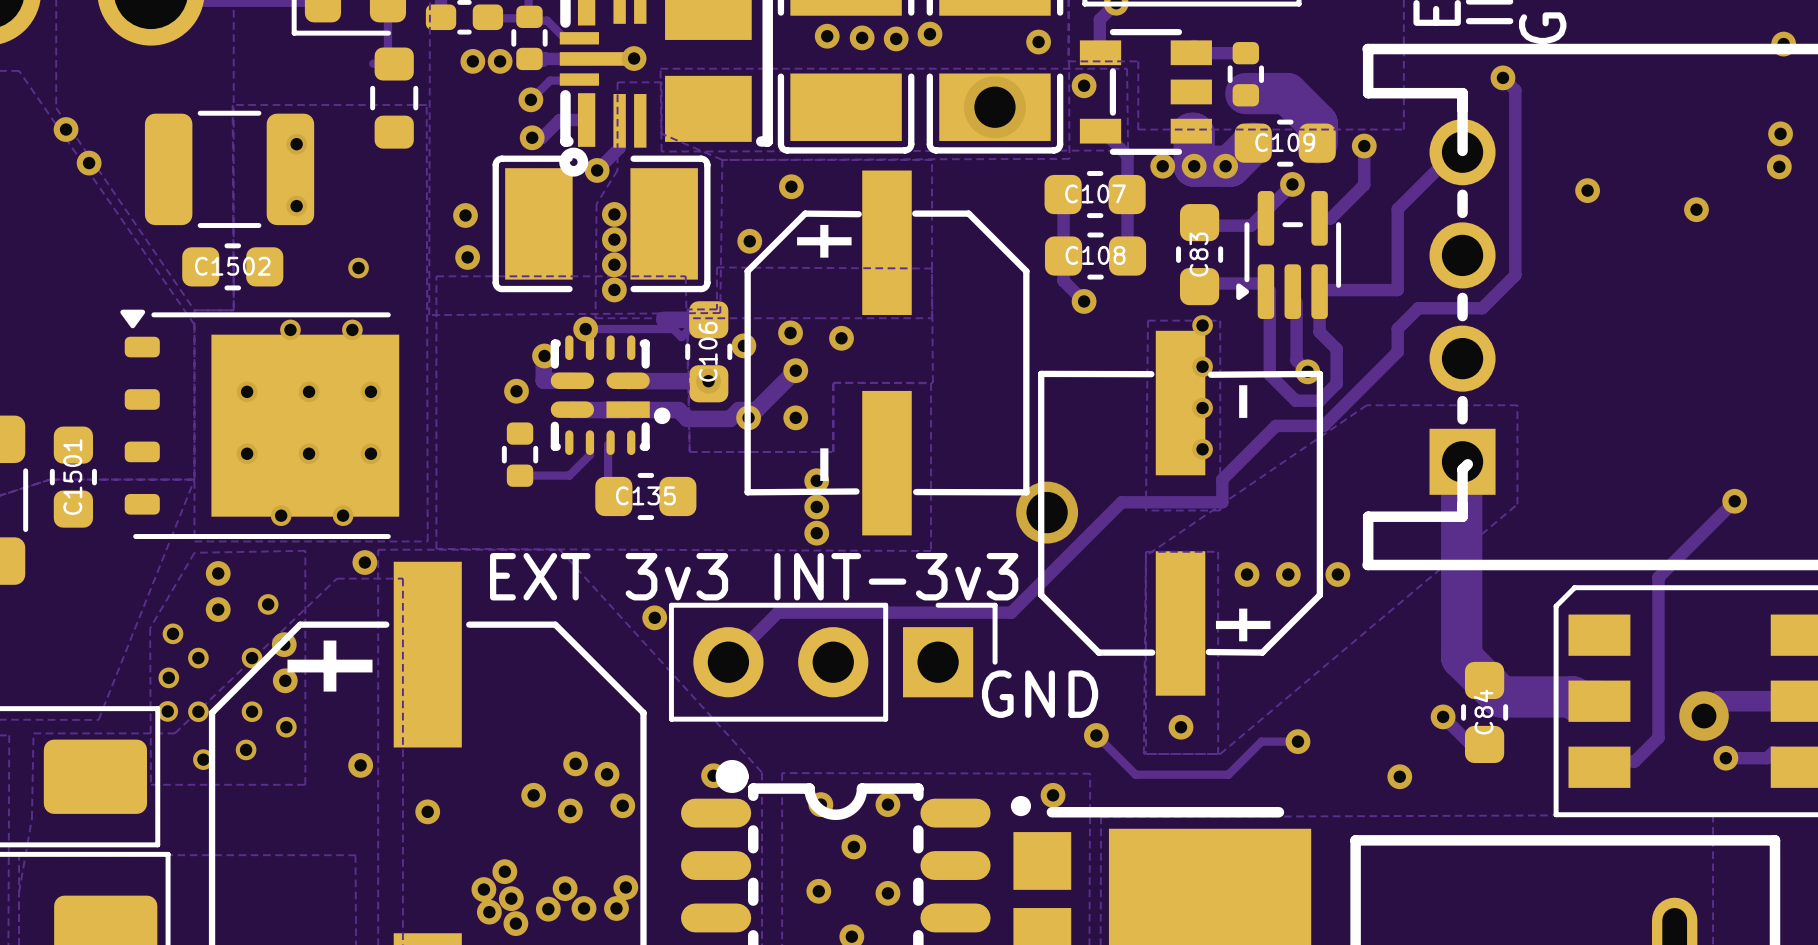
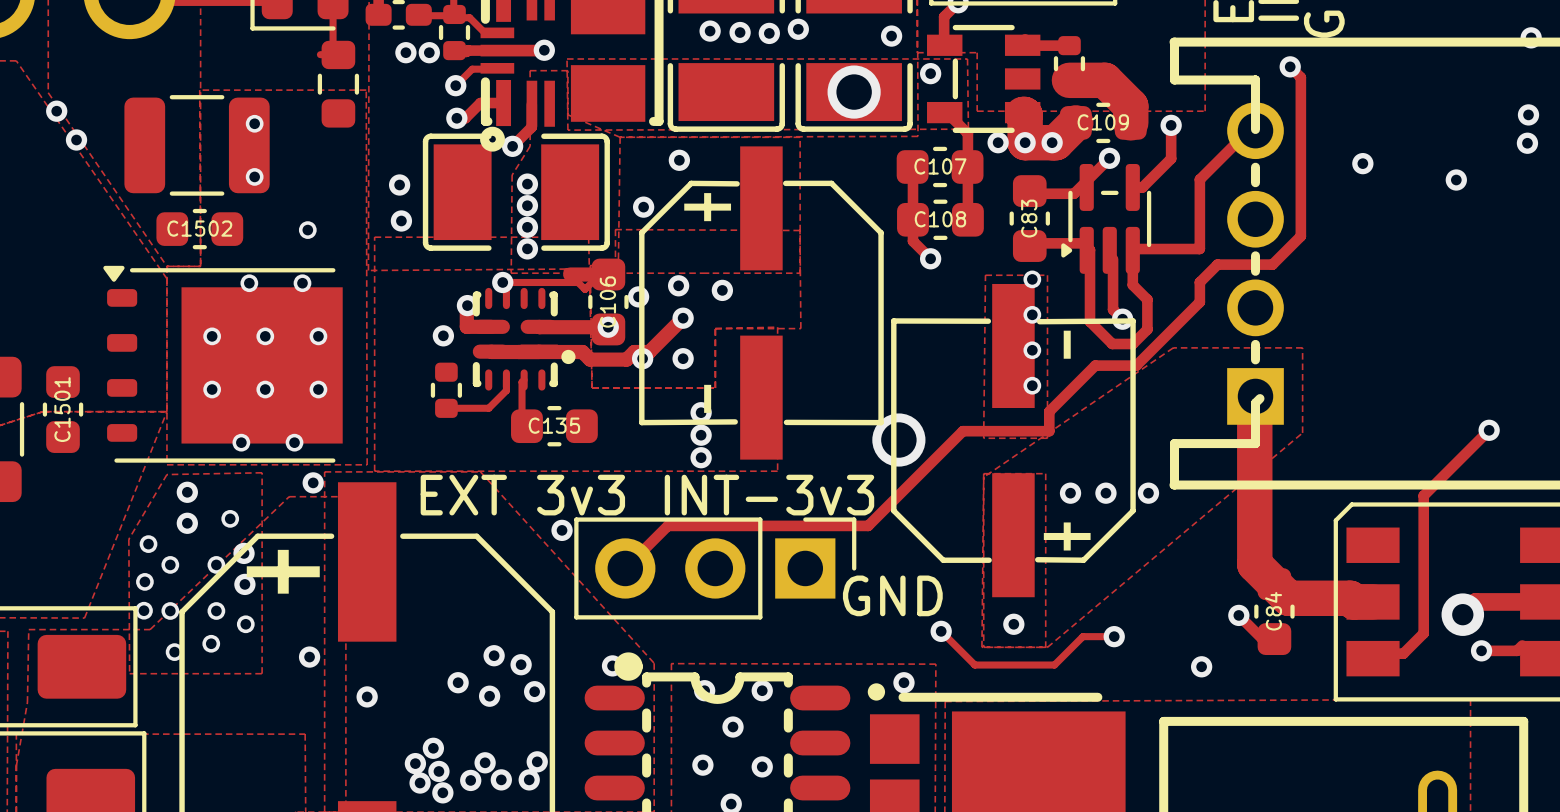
zone outline: (833, 382) (931, 383) (931, 551) (436, 548) -> (715, 328) (777, 327) (777, 471) (374, 471)

